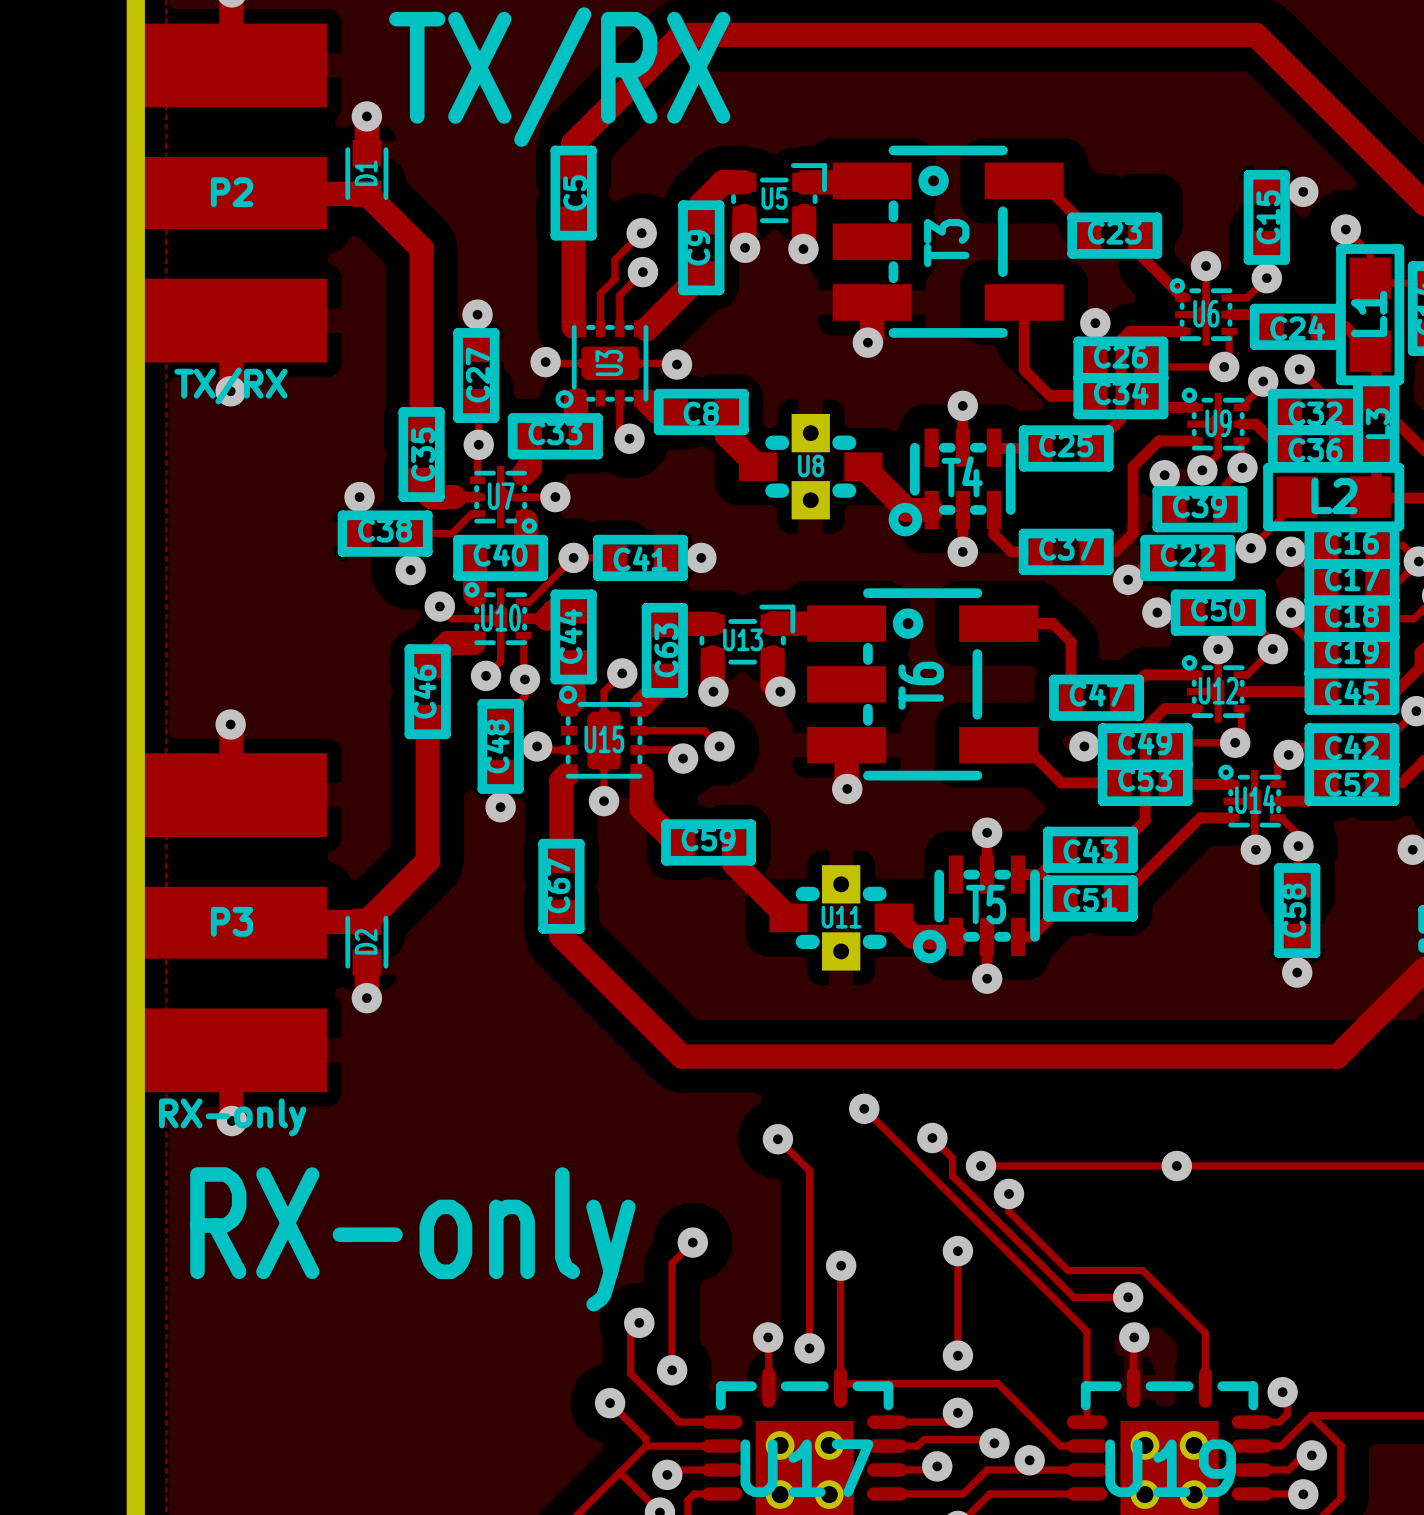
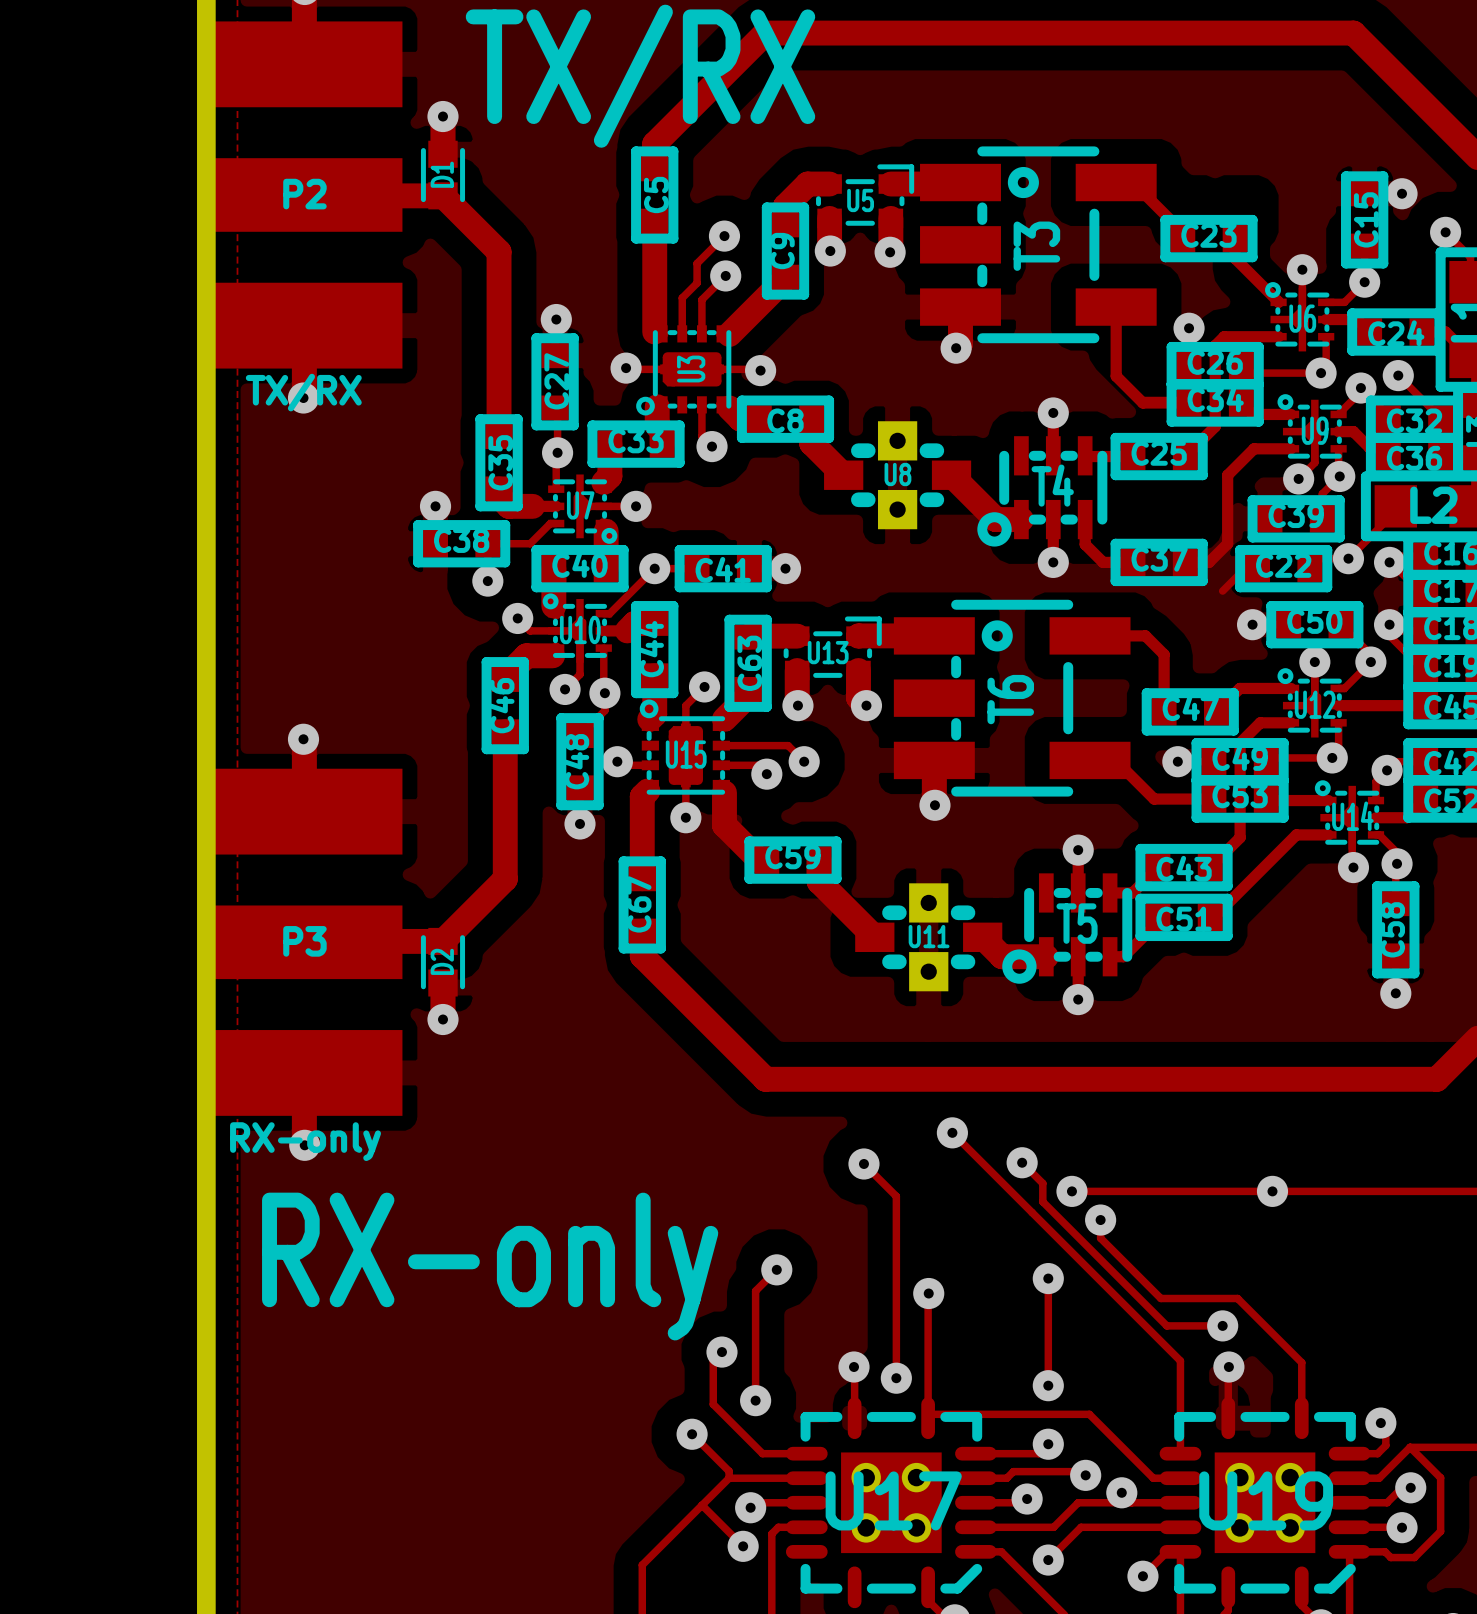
via: (1164, 475) -> none
via: (1128, 579) -> none

